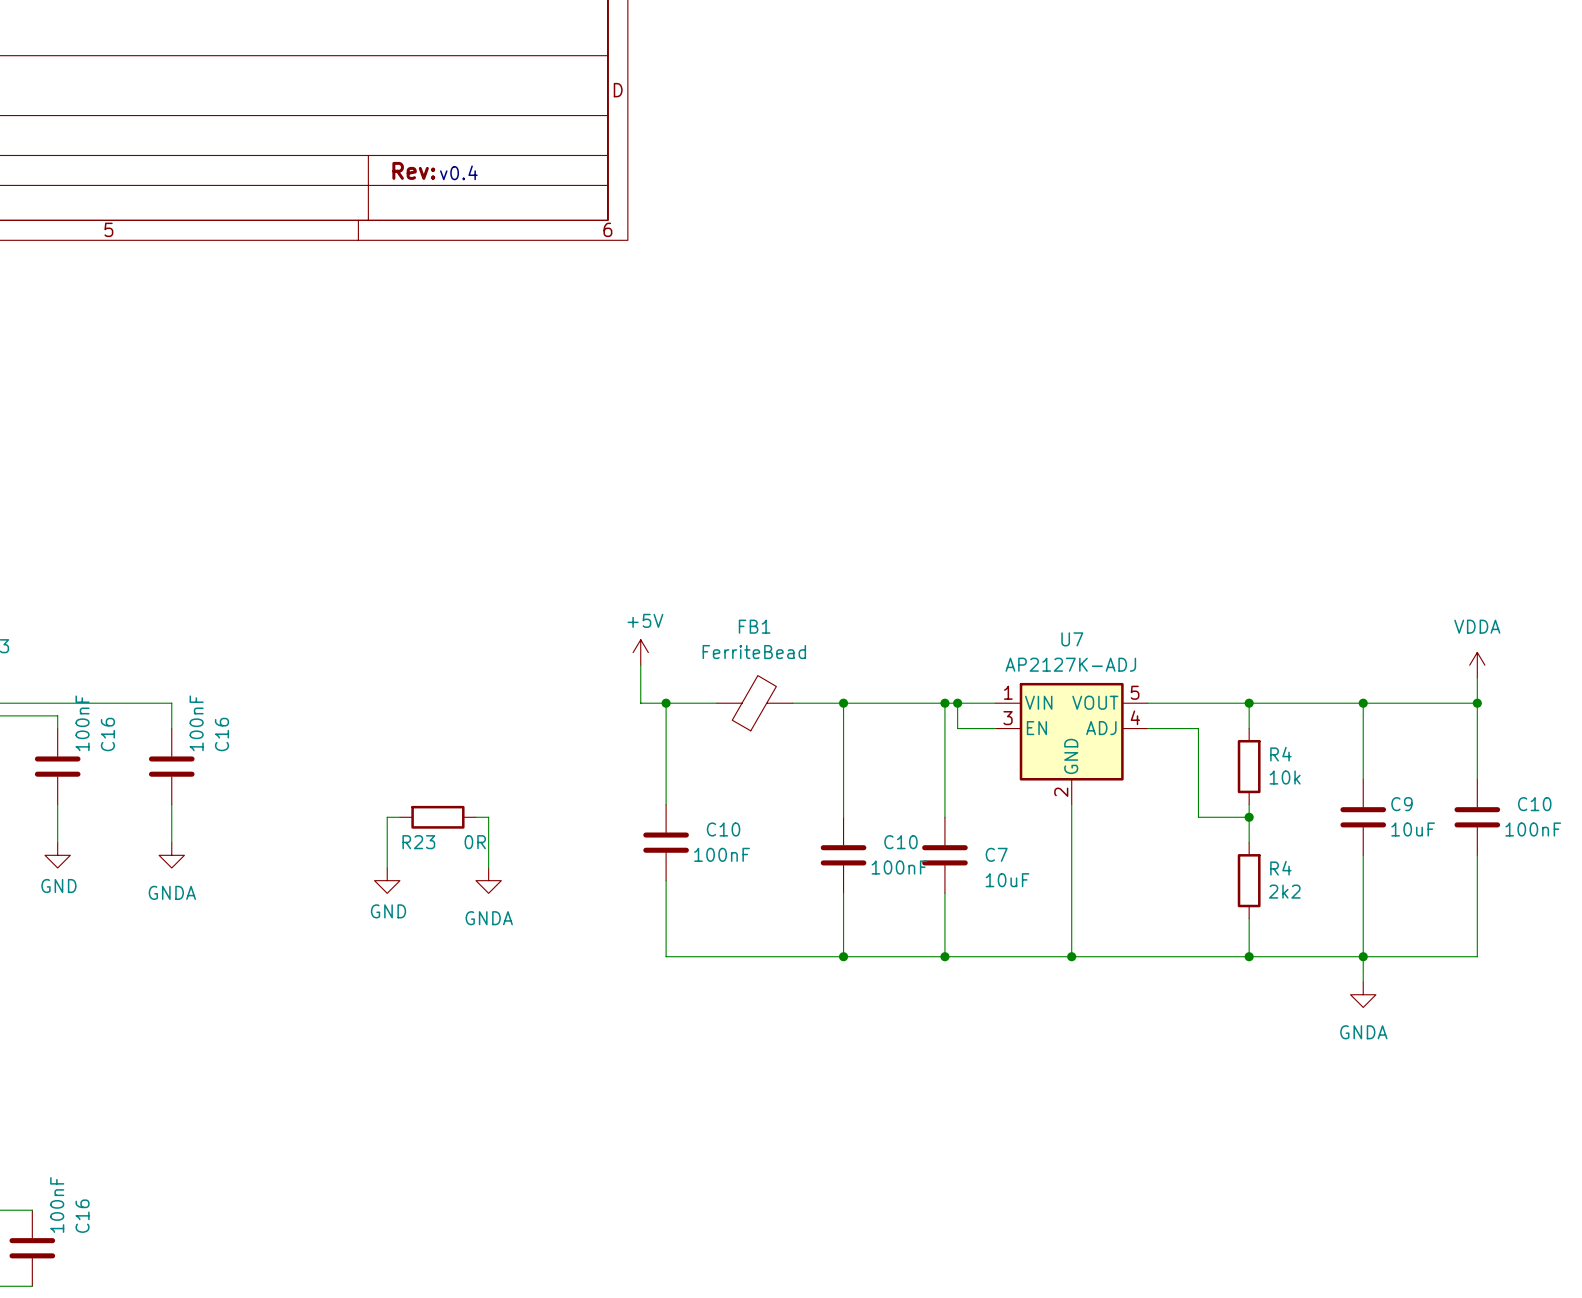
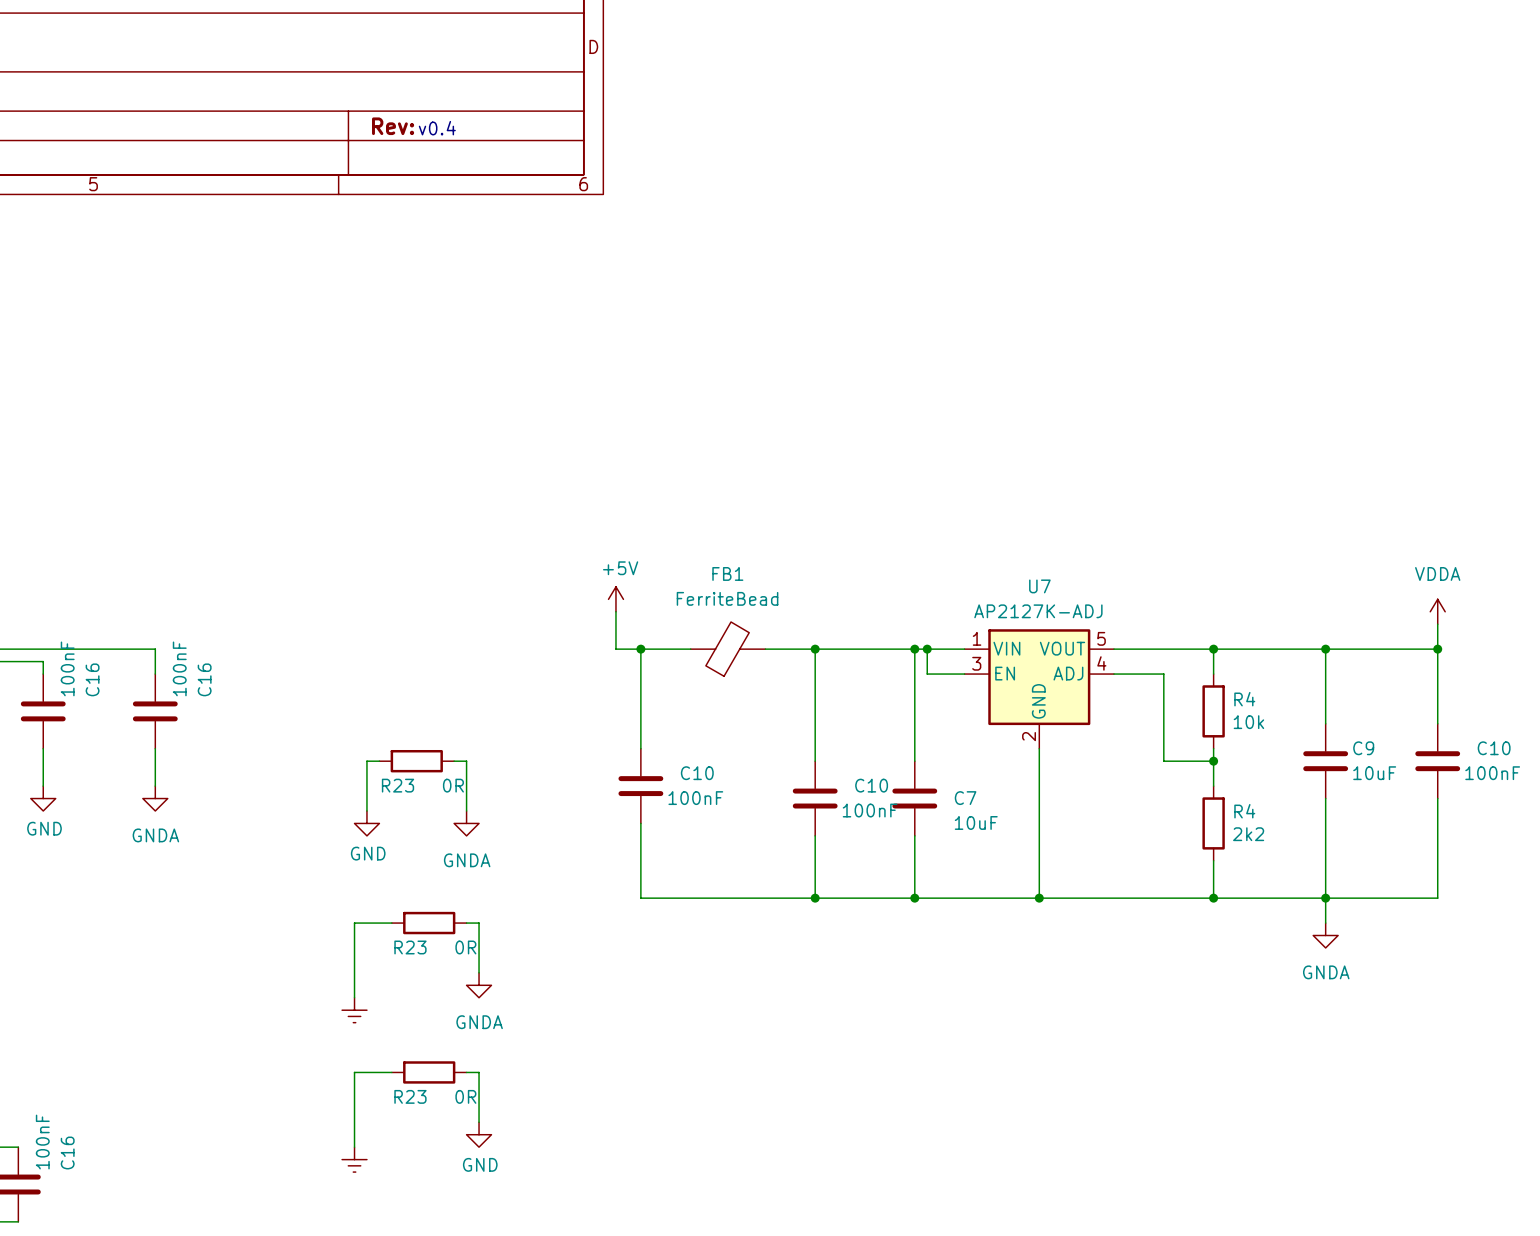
wire: none -> (391, 923) (354, 923) (354, 997)
R23: none -> 0R (429, 923)
wire: none -> (466, 923) (479, 923) (479, 972)
power symbol: none -> GNDA (479, 985)
power symbol: none -> (354, 1010)
wire: none -> (391, 1072) (354, 1072) (354, 1147)
R23: none -> 0R (429, 1072)
wire: none -> (466, 1072) (479, 1072) (479, 1122)
power symbol: none -> GND (479, 1134)
power symbol: none -> (354, 1159)

